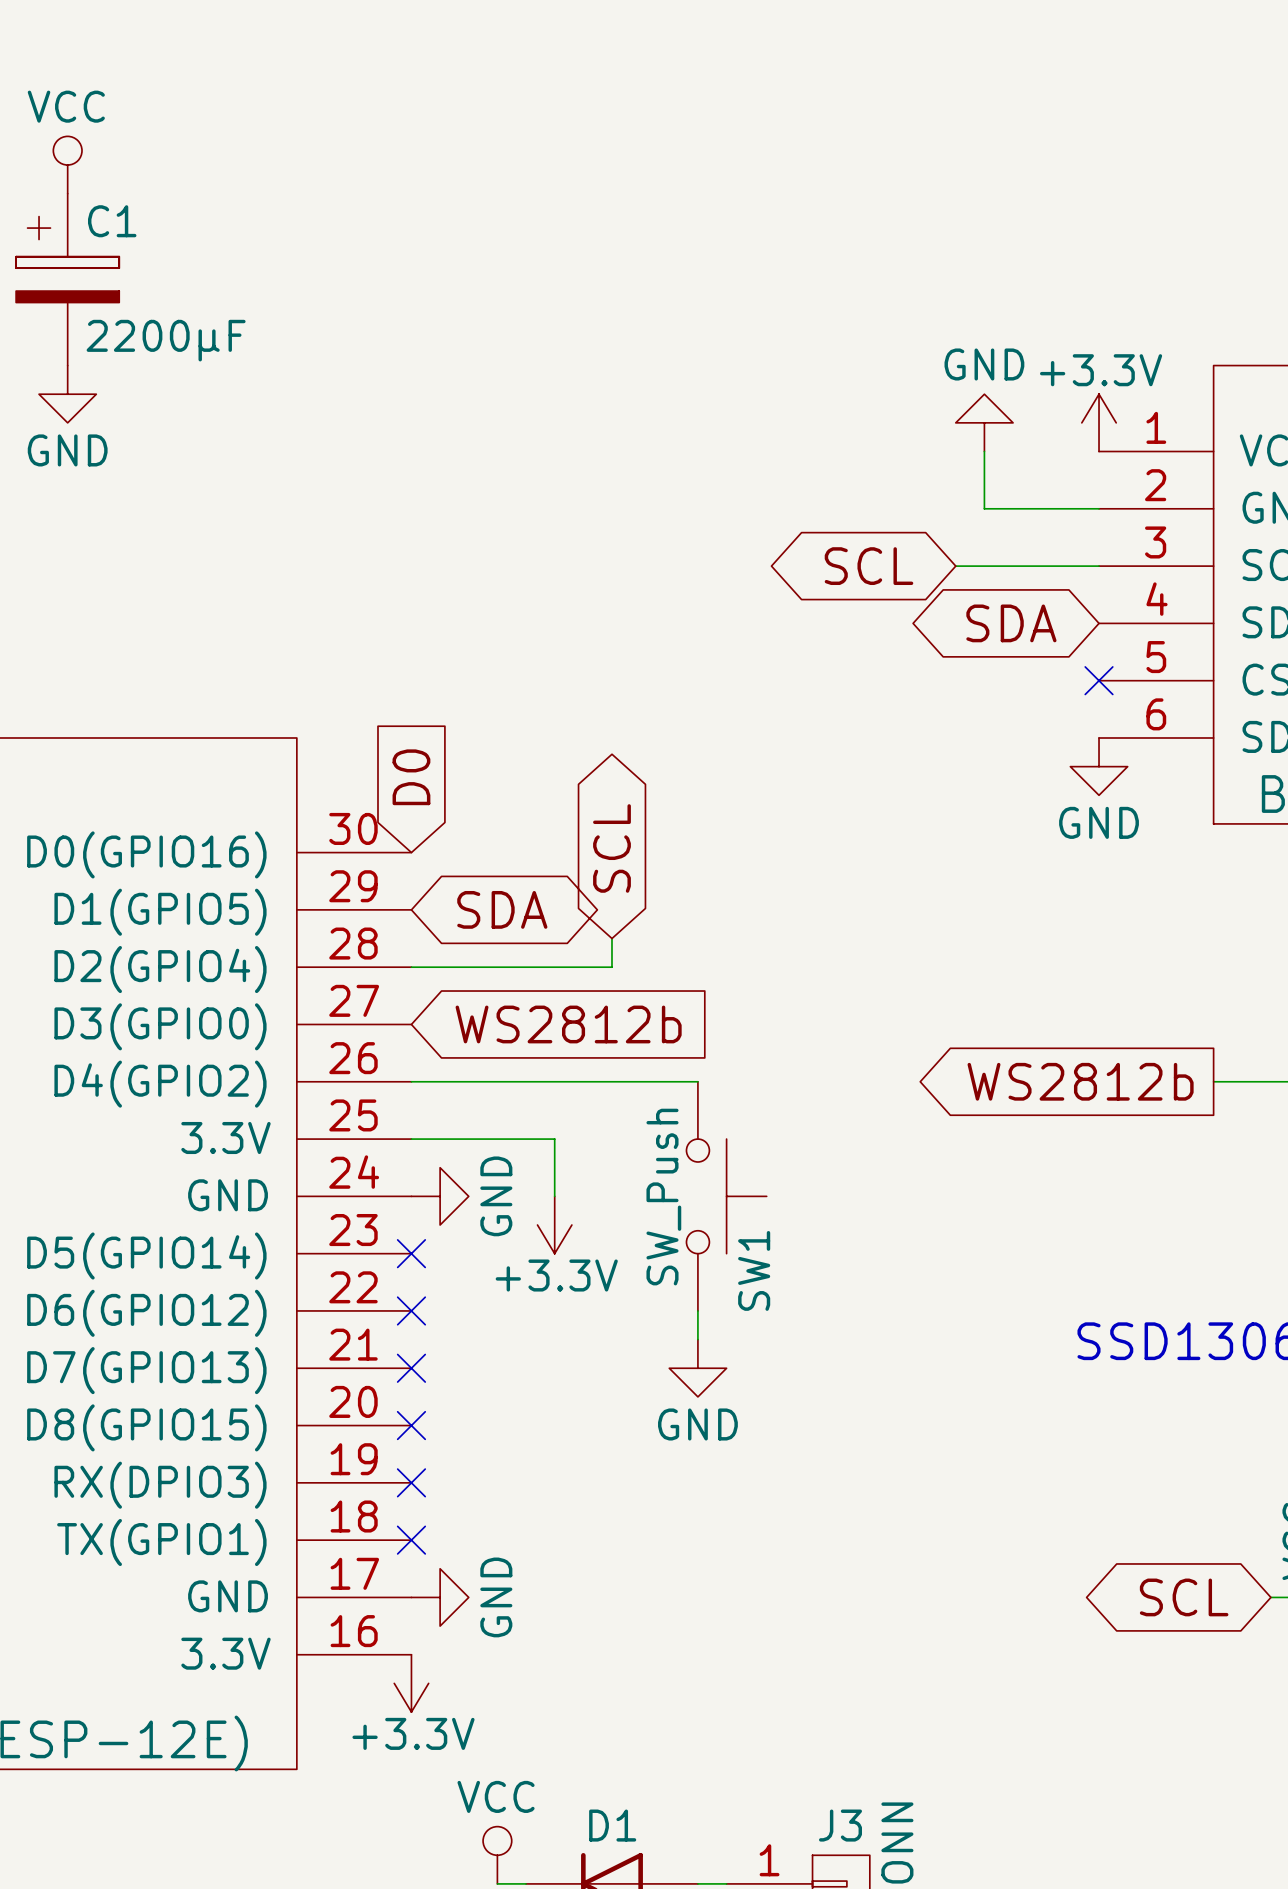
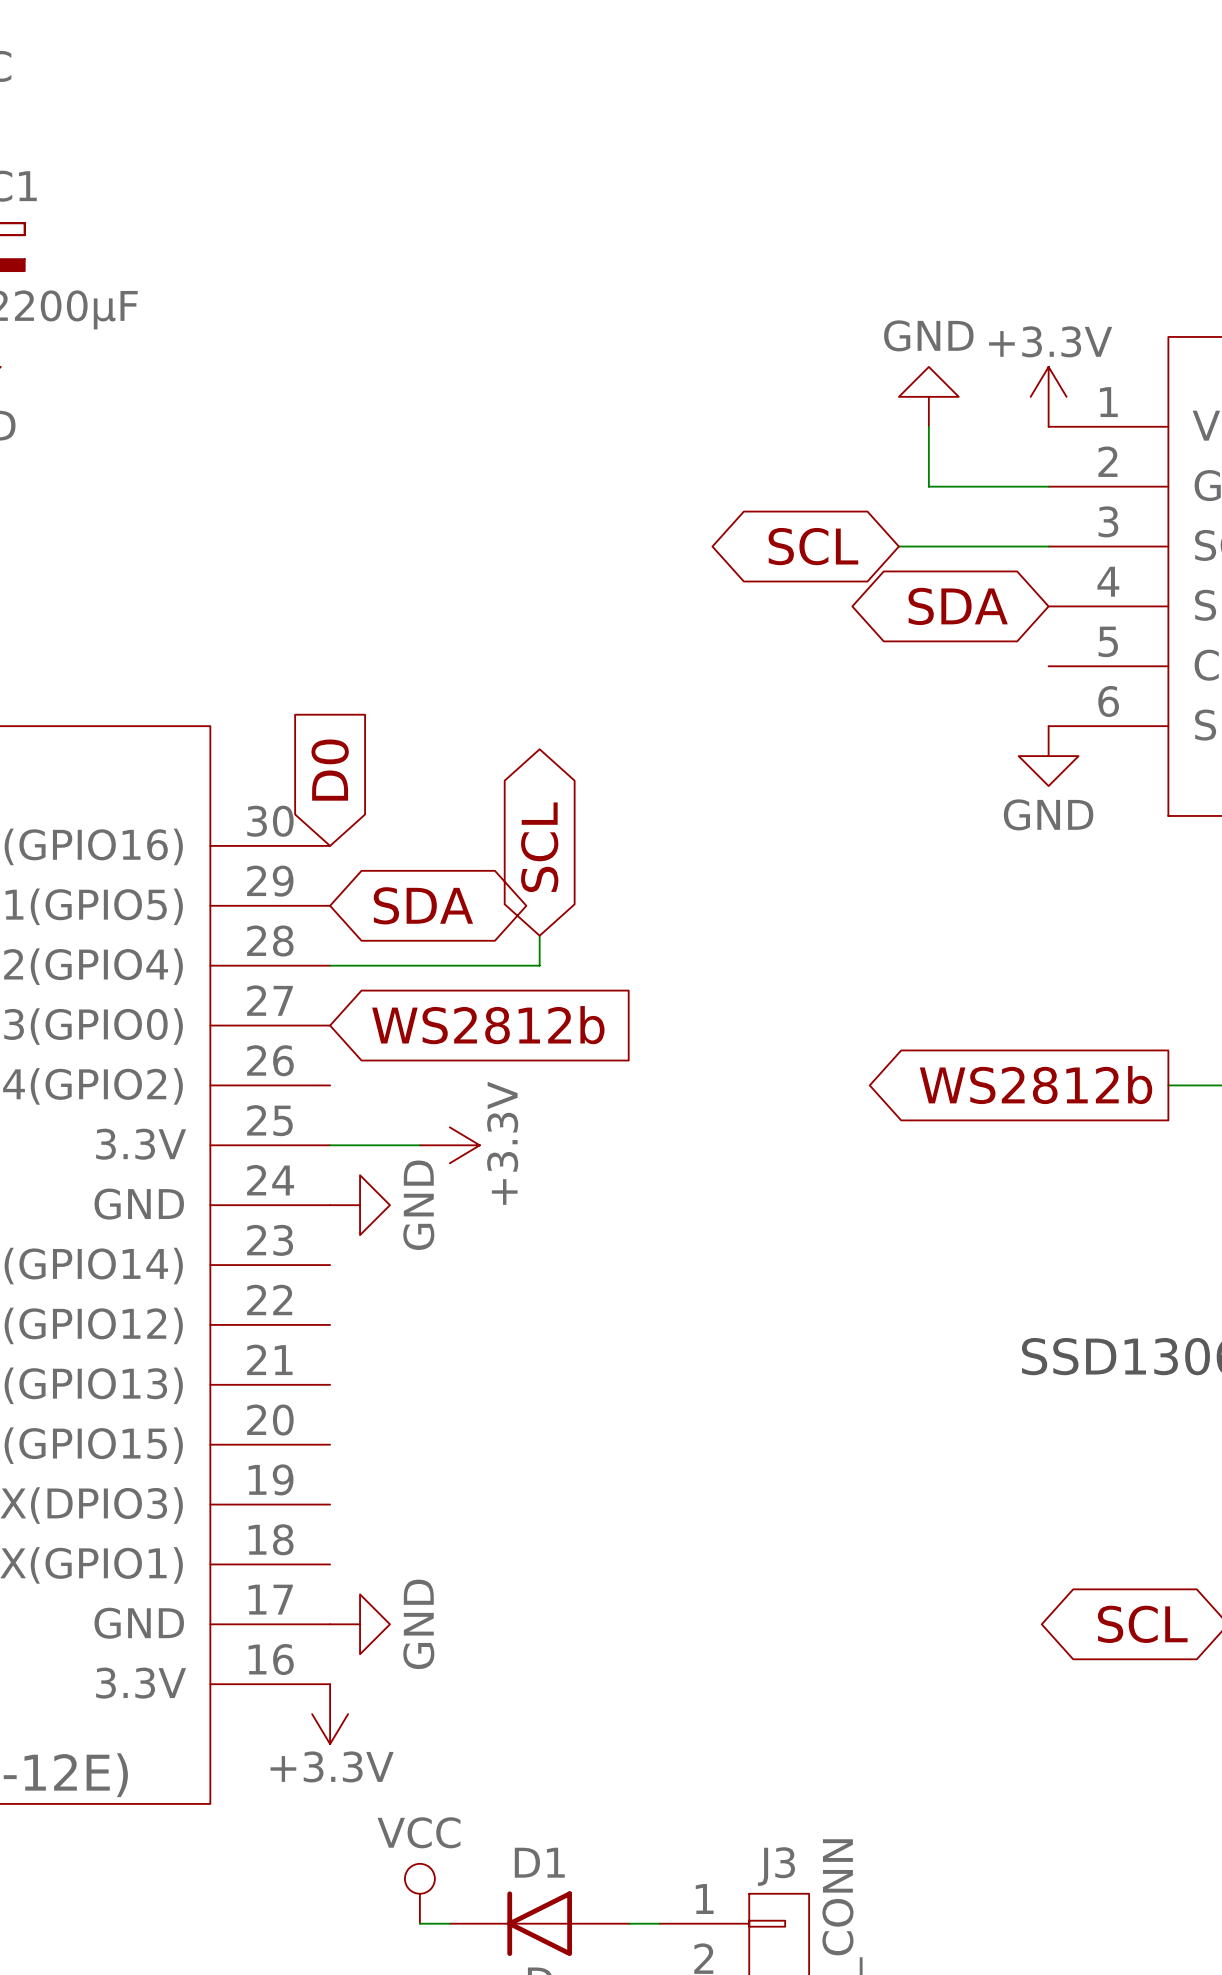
no-connect mark: (1099, 680) -> none
wire: (411, 1081) (697, 1081) -> none
wire: (497, 1139) (554, 1139) (554, 1196) -> none
SW1: SW_Push (726, 1196) -> none
power symbol rotation: 0° (554, 1225) -> 90° counterclockwise (449, 1145)
power symbol position: +3.3V (554, 1225) -> +3.3V (449, 1145)
no-connect mark: (411, 1253) -> none
no-connect mark: (411, 1310) -> none
wire: (697, 1310) (697, 1339) -> none
no-connect mark: (411, 1368) -> none
power symbol: GND (697, 1368) -> none
no-connect mark: (411, 1425) -> none
no-connect mark: (411, 1482) -> none
no-connect mark: (411, 1540) -> none

